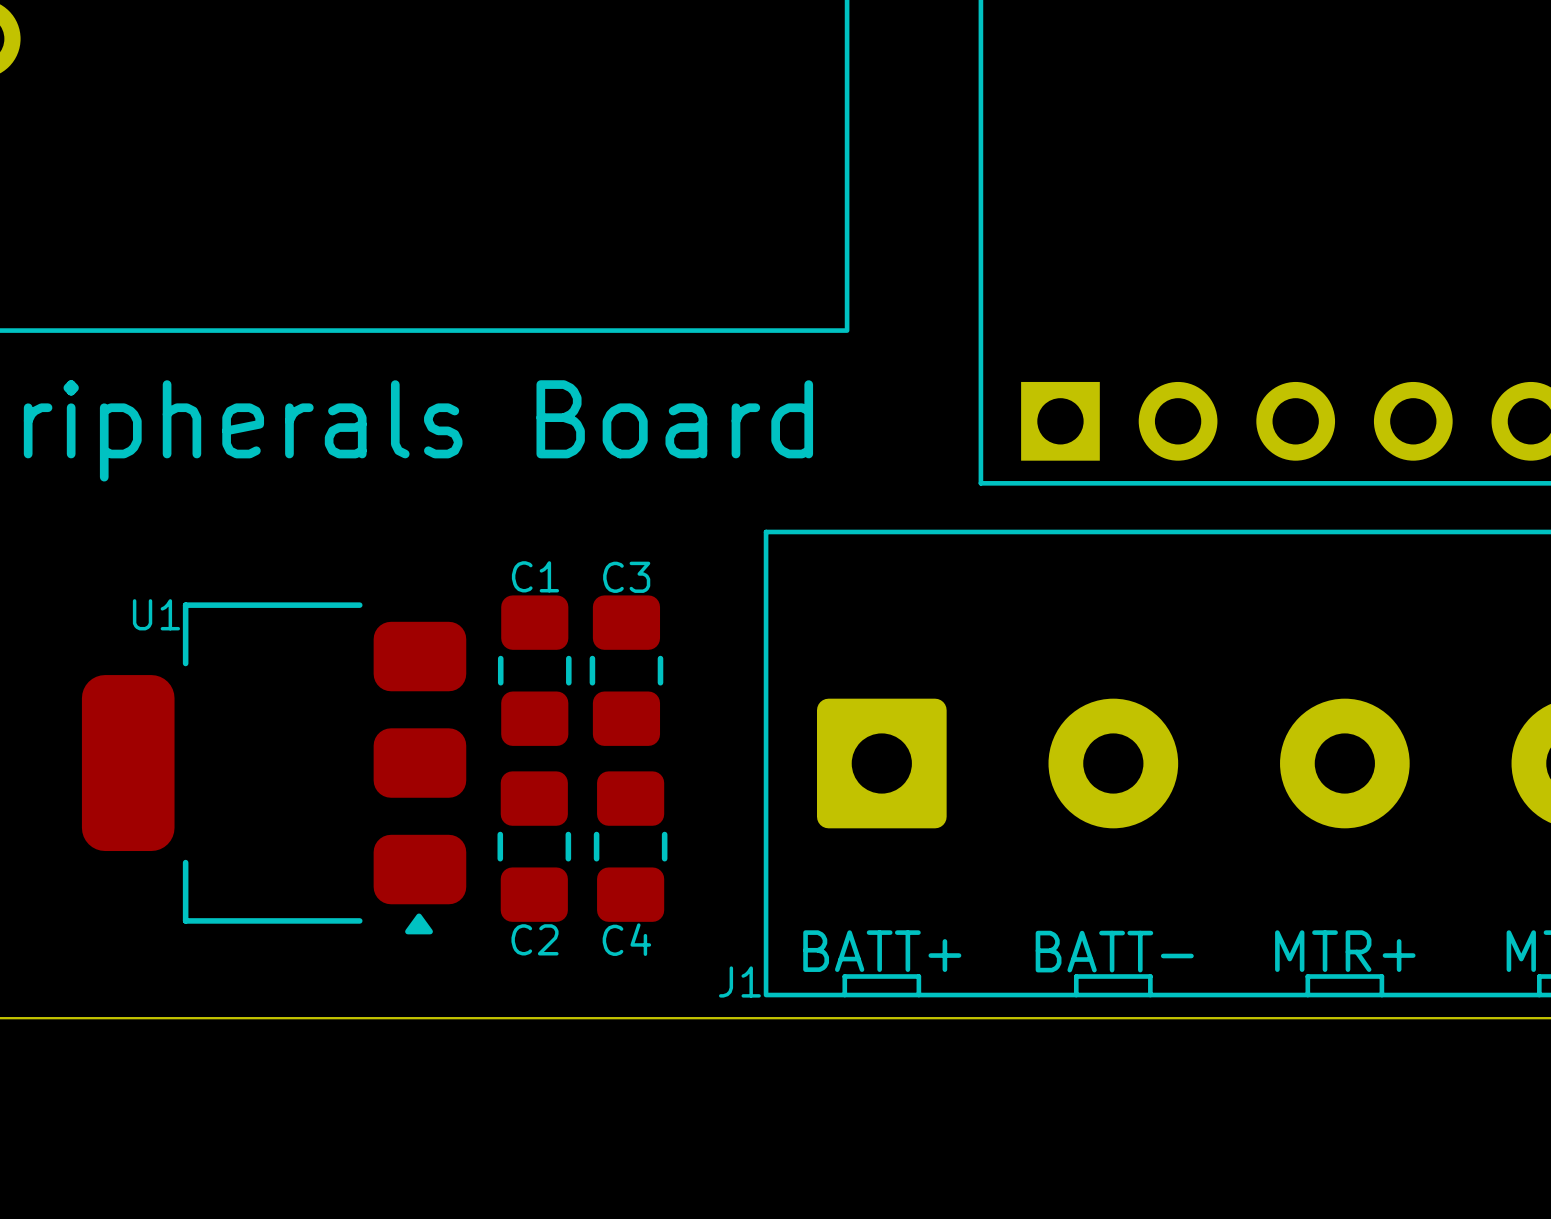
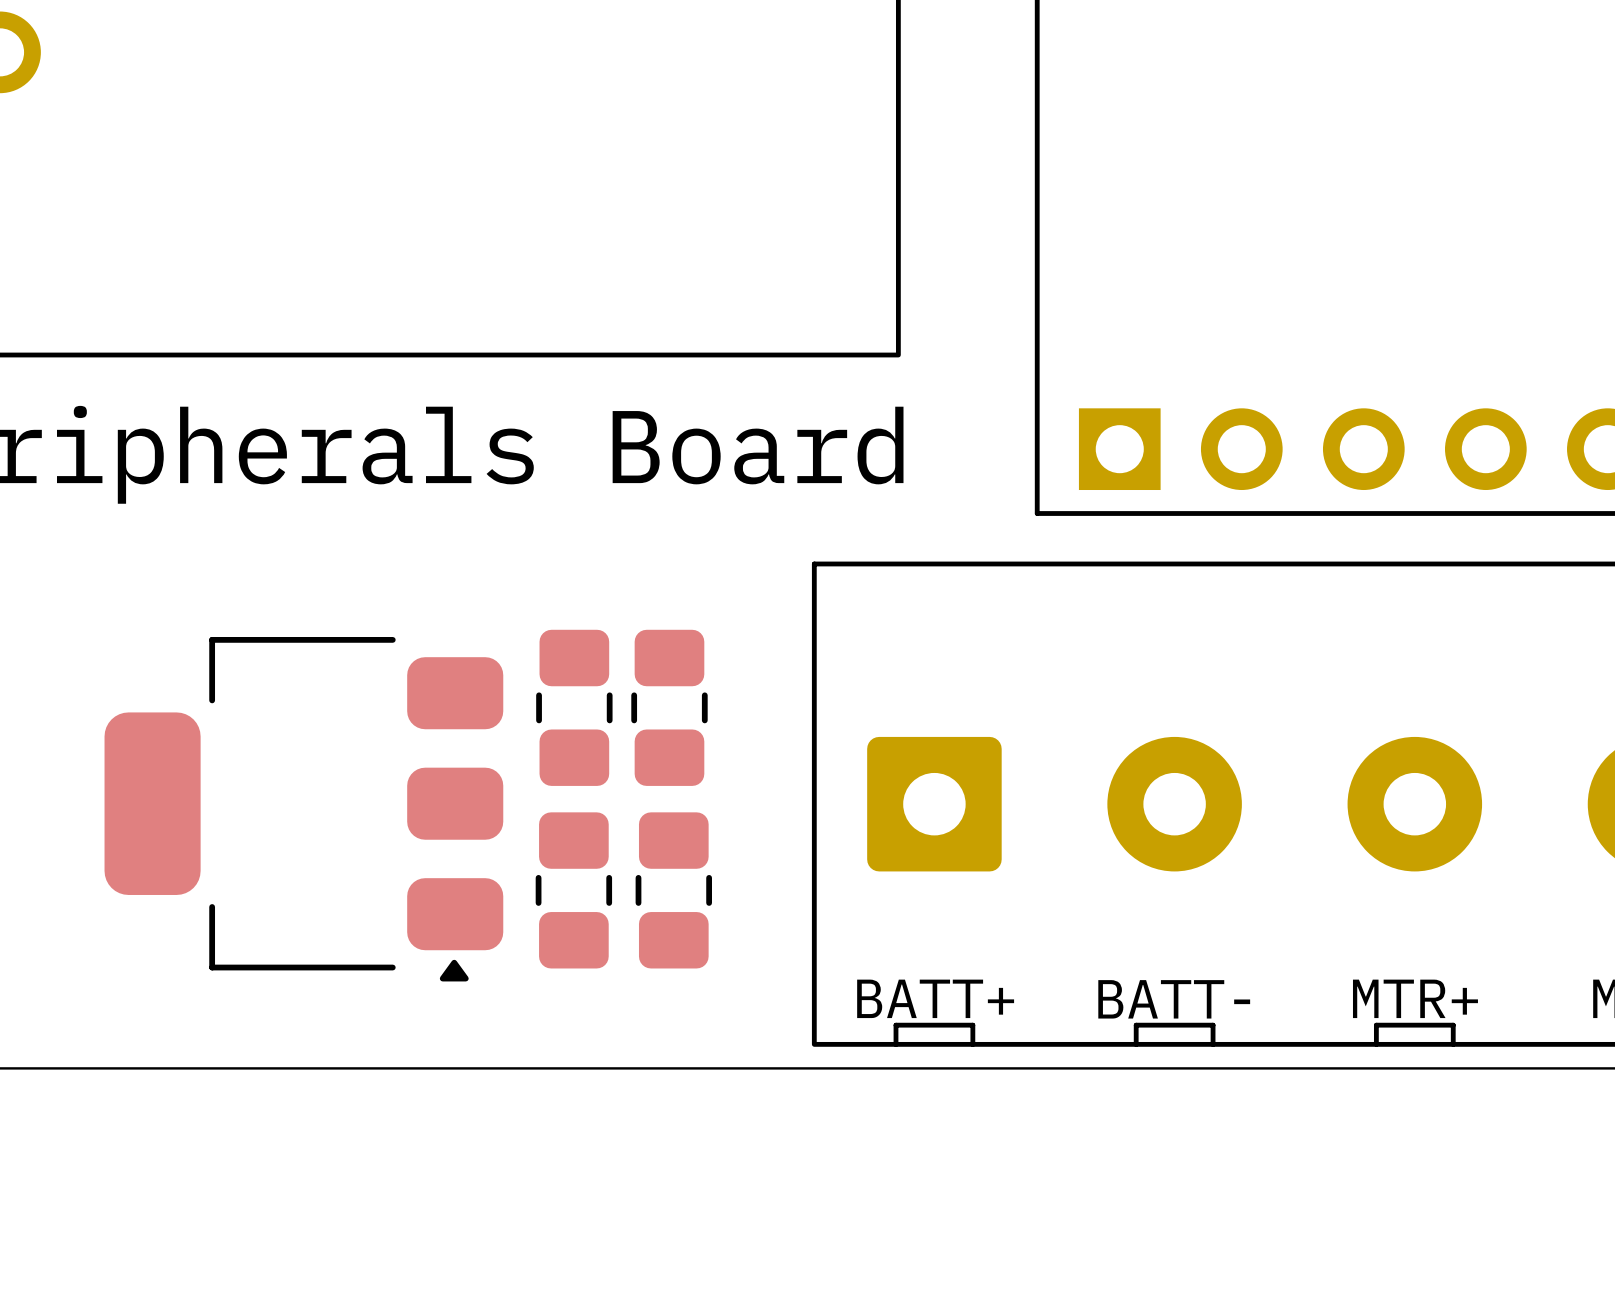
text: C1 (535, 576) -> none
text: C3 (626, 577) -> none
text: U1 (156, 614) -> none
text: C2 (535, 939) -> none
text: C4 (626, 939) -> none
text: J1 (739, 981) -> none

